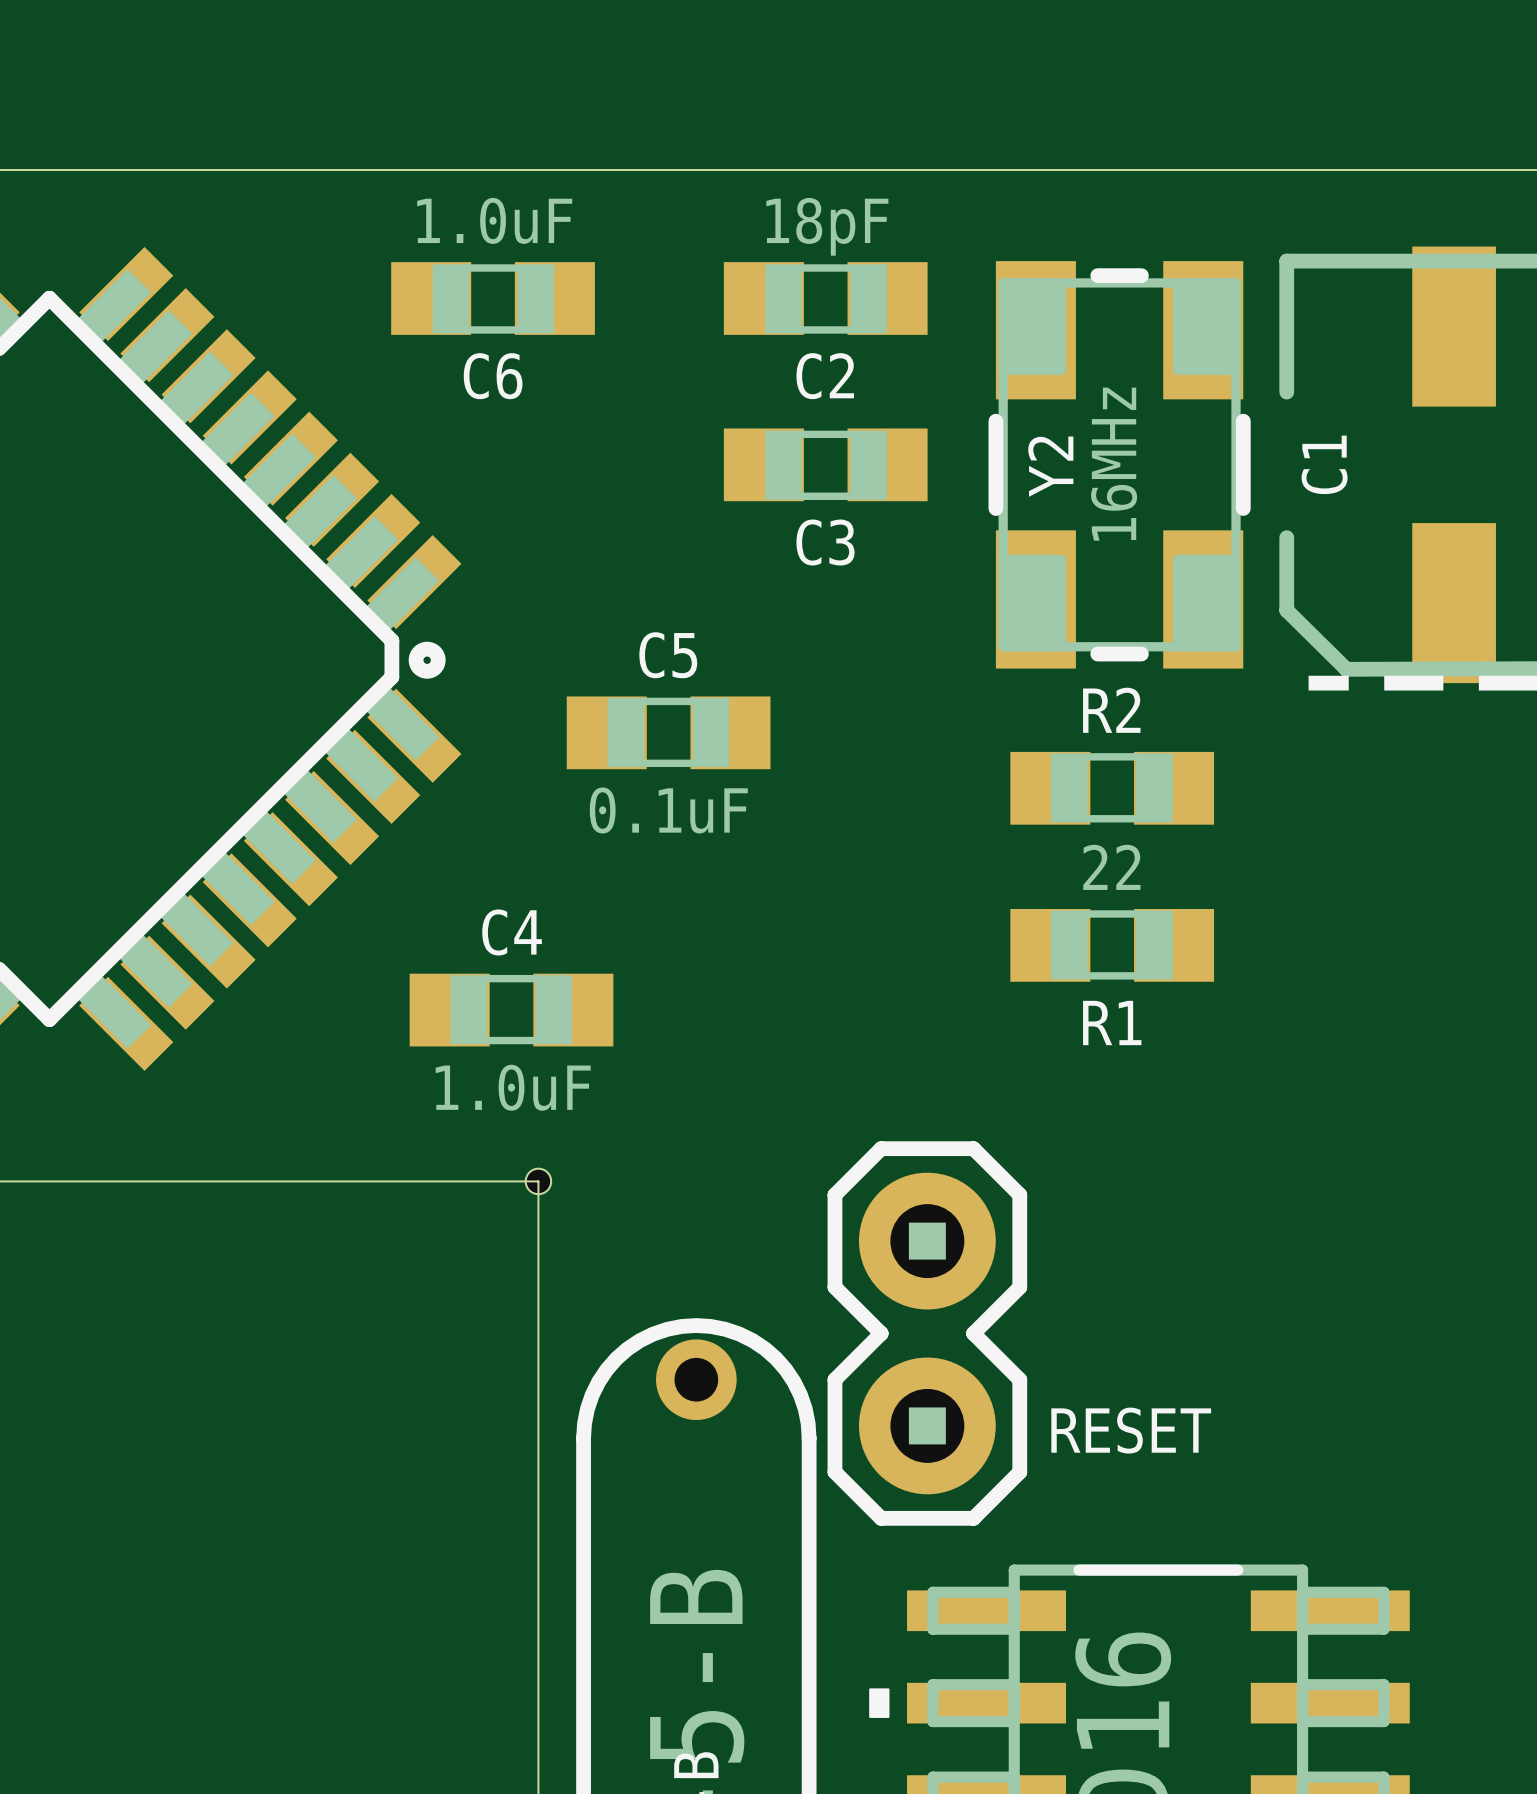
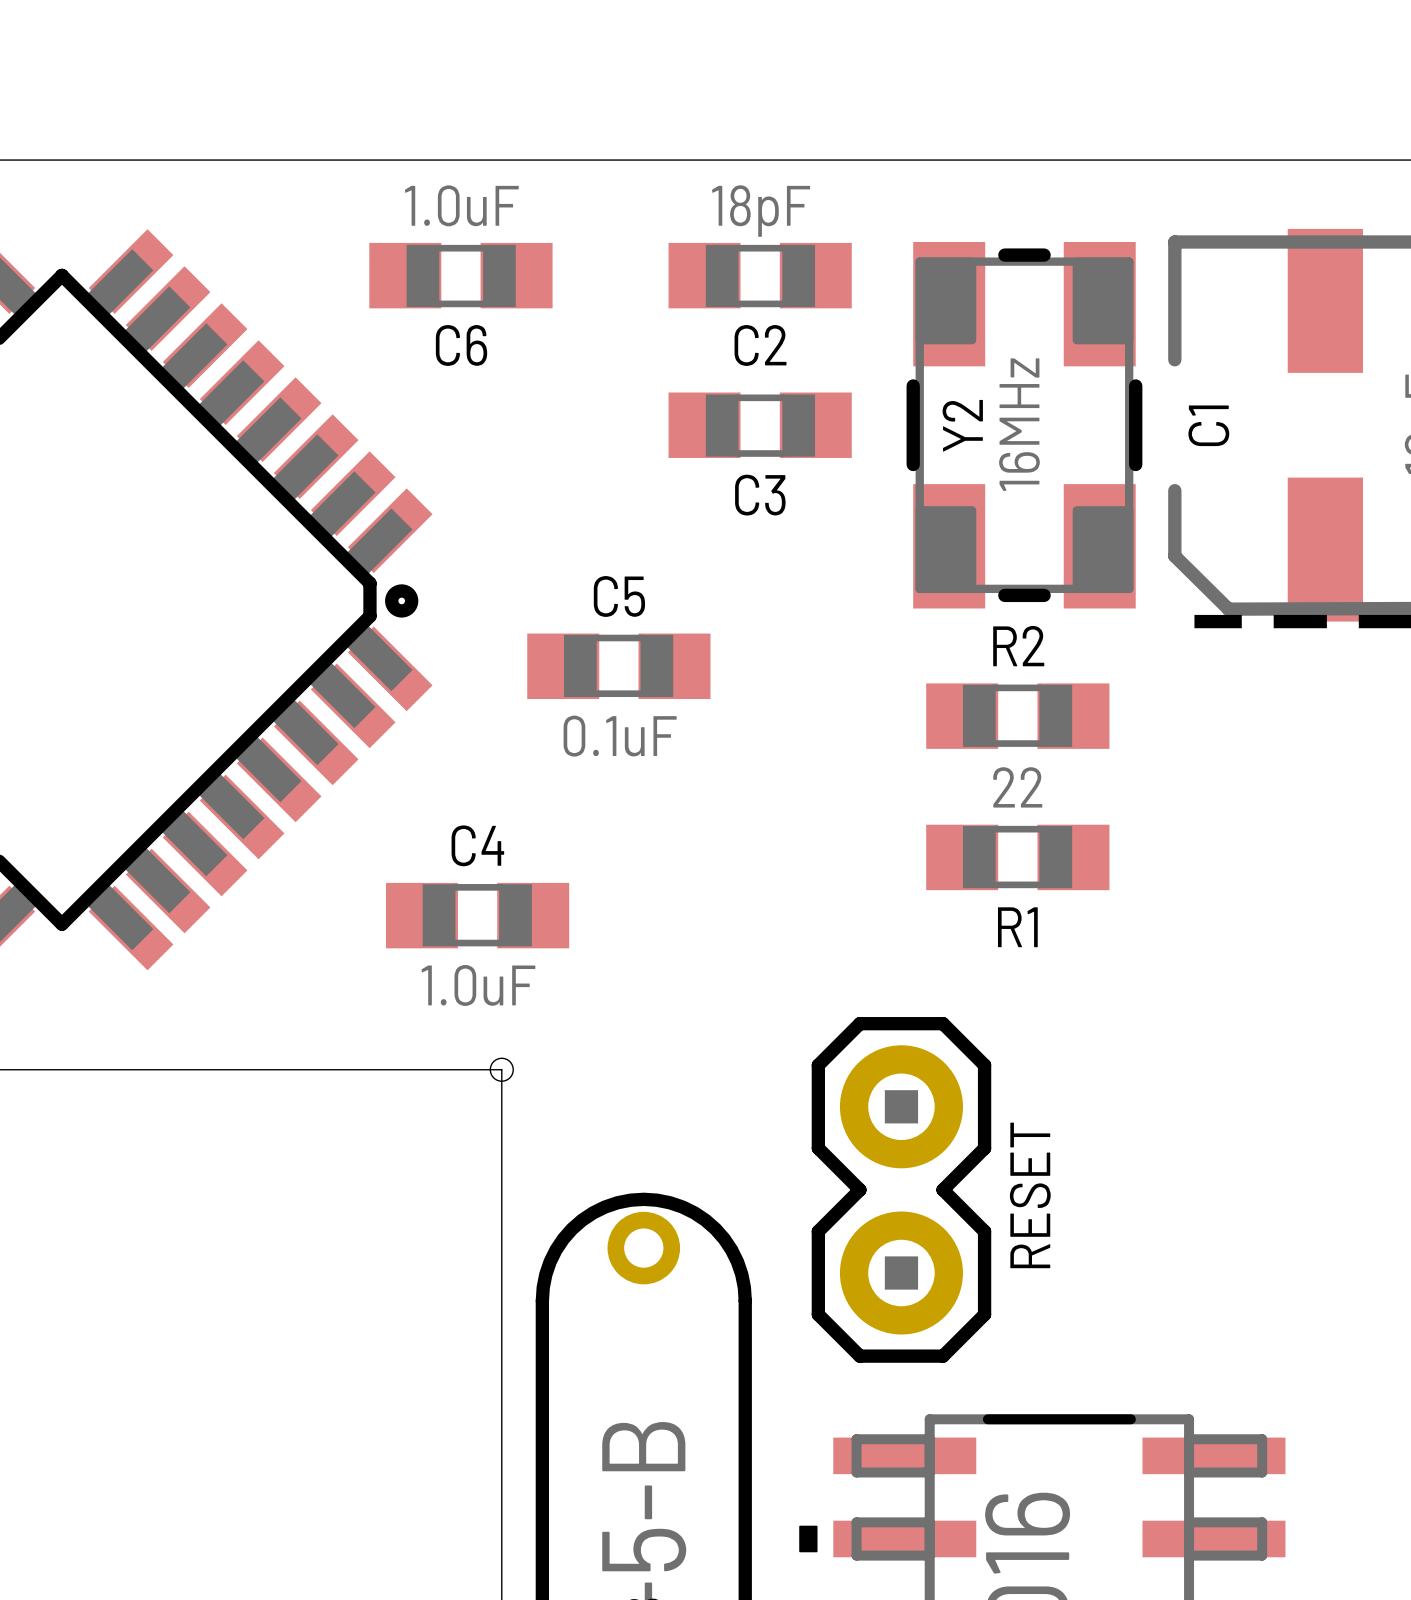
part position: (927, 1333) -> (901, 1189)
text rotation: 0° (1131, 1430) -> 90° counterclockwise (1030, 1195)

